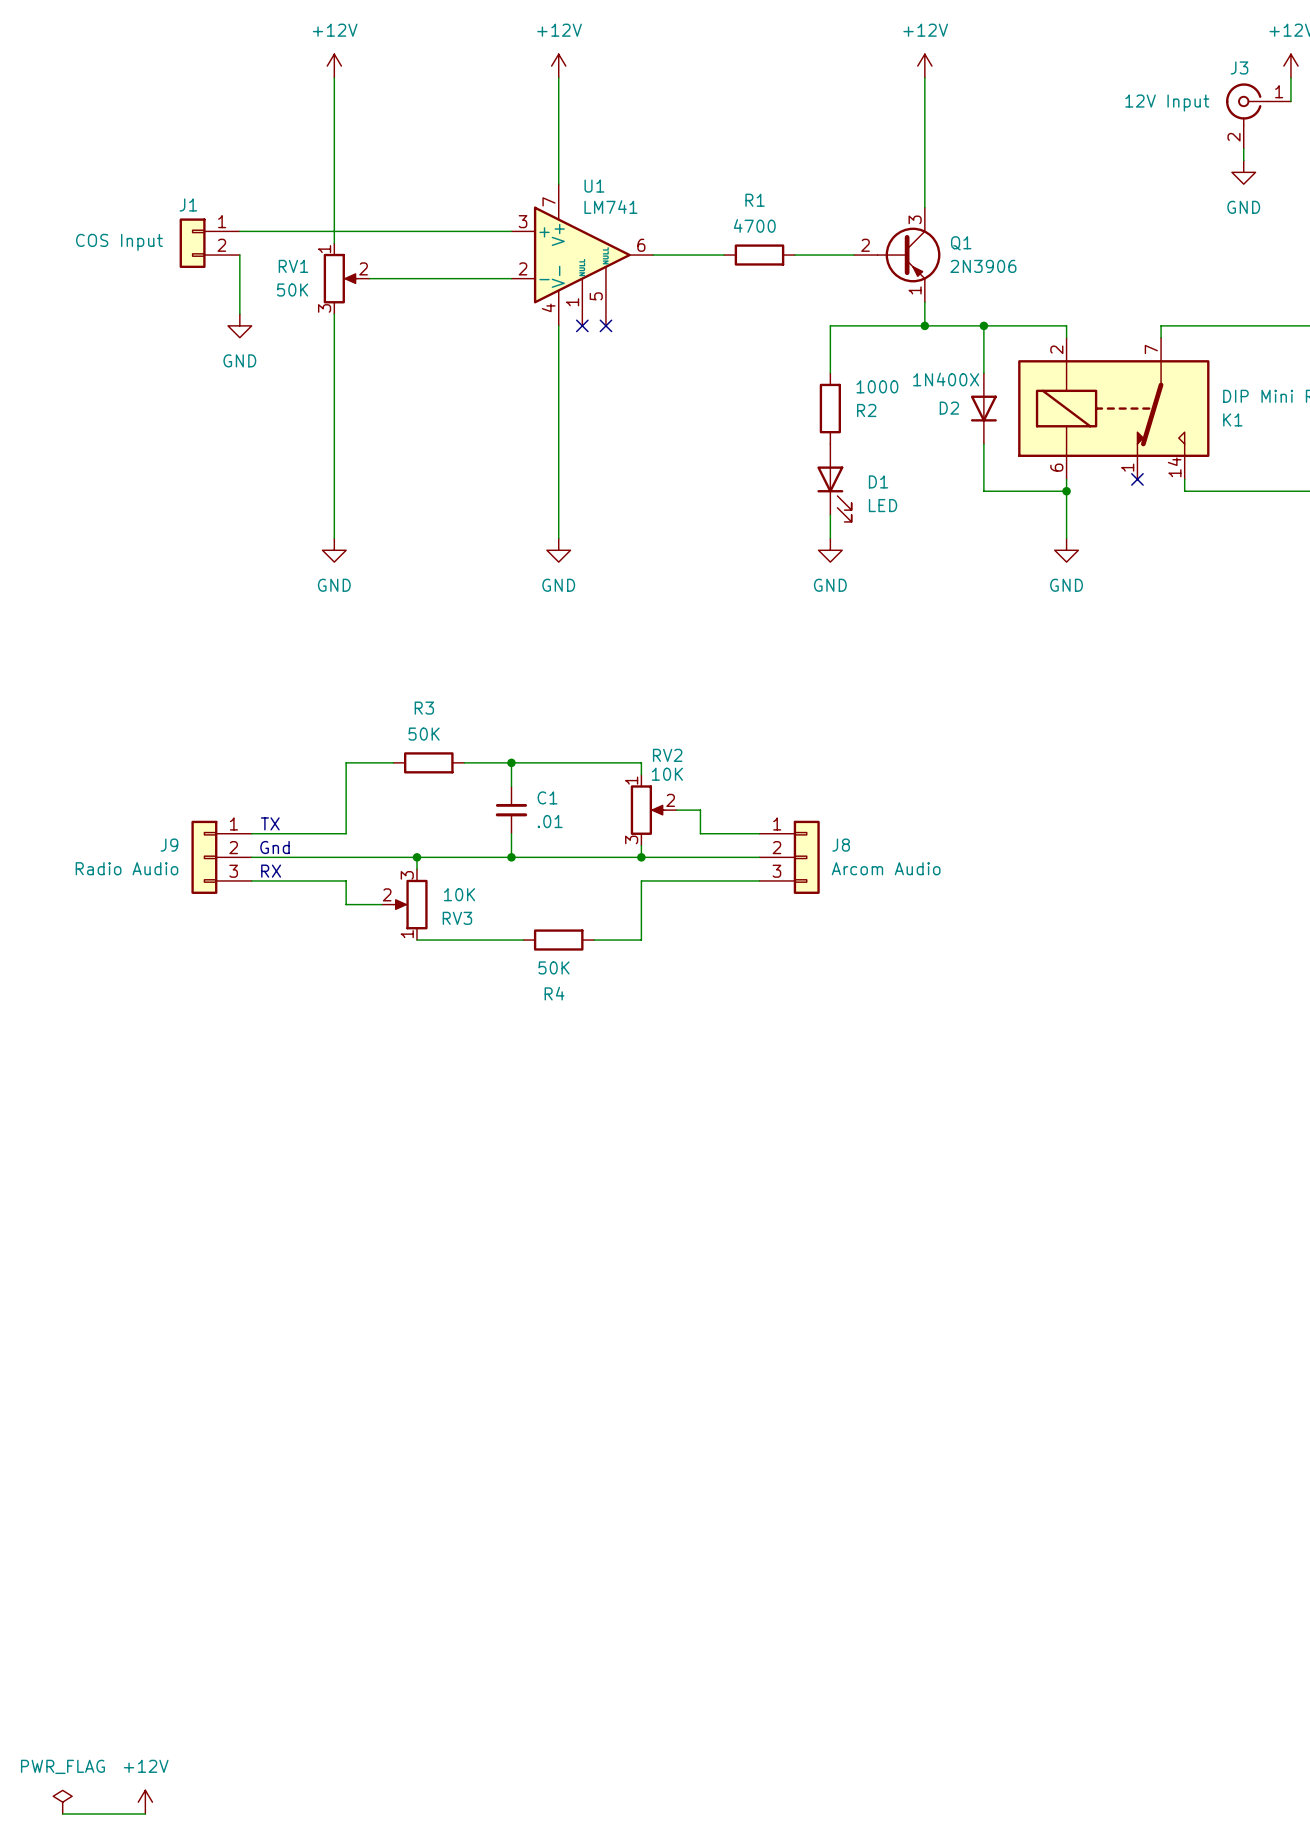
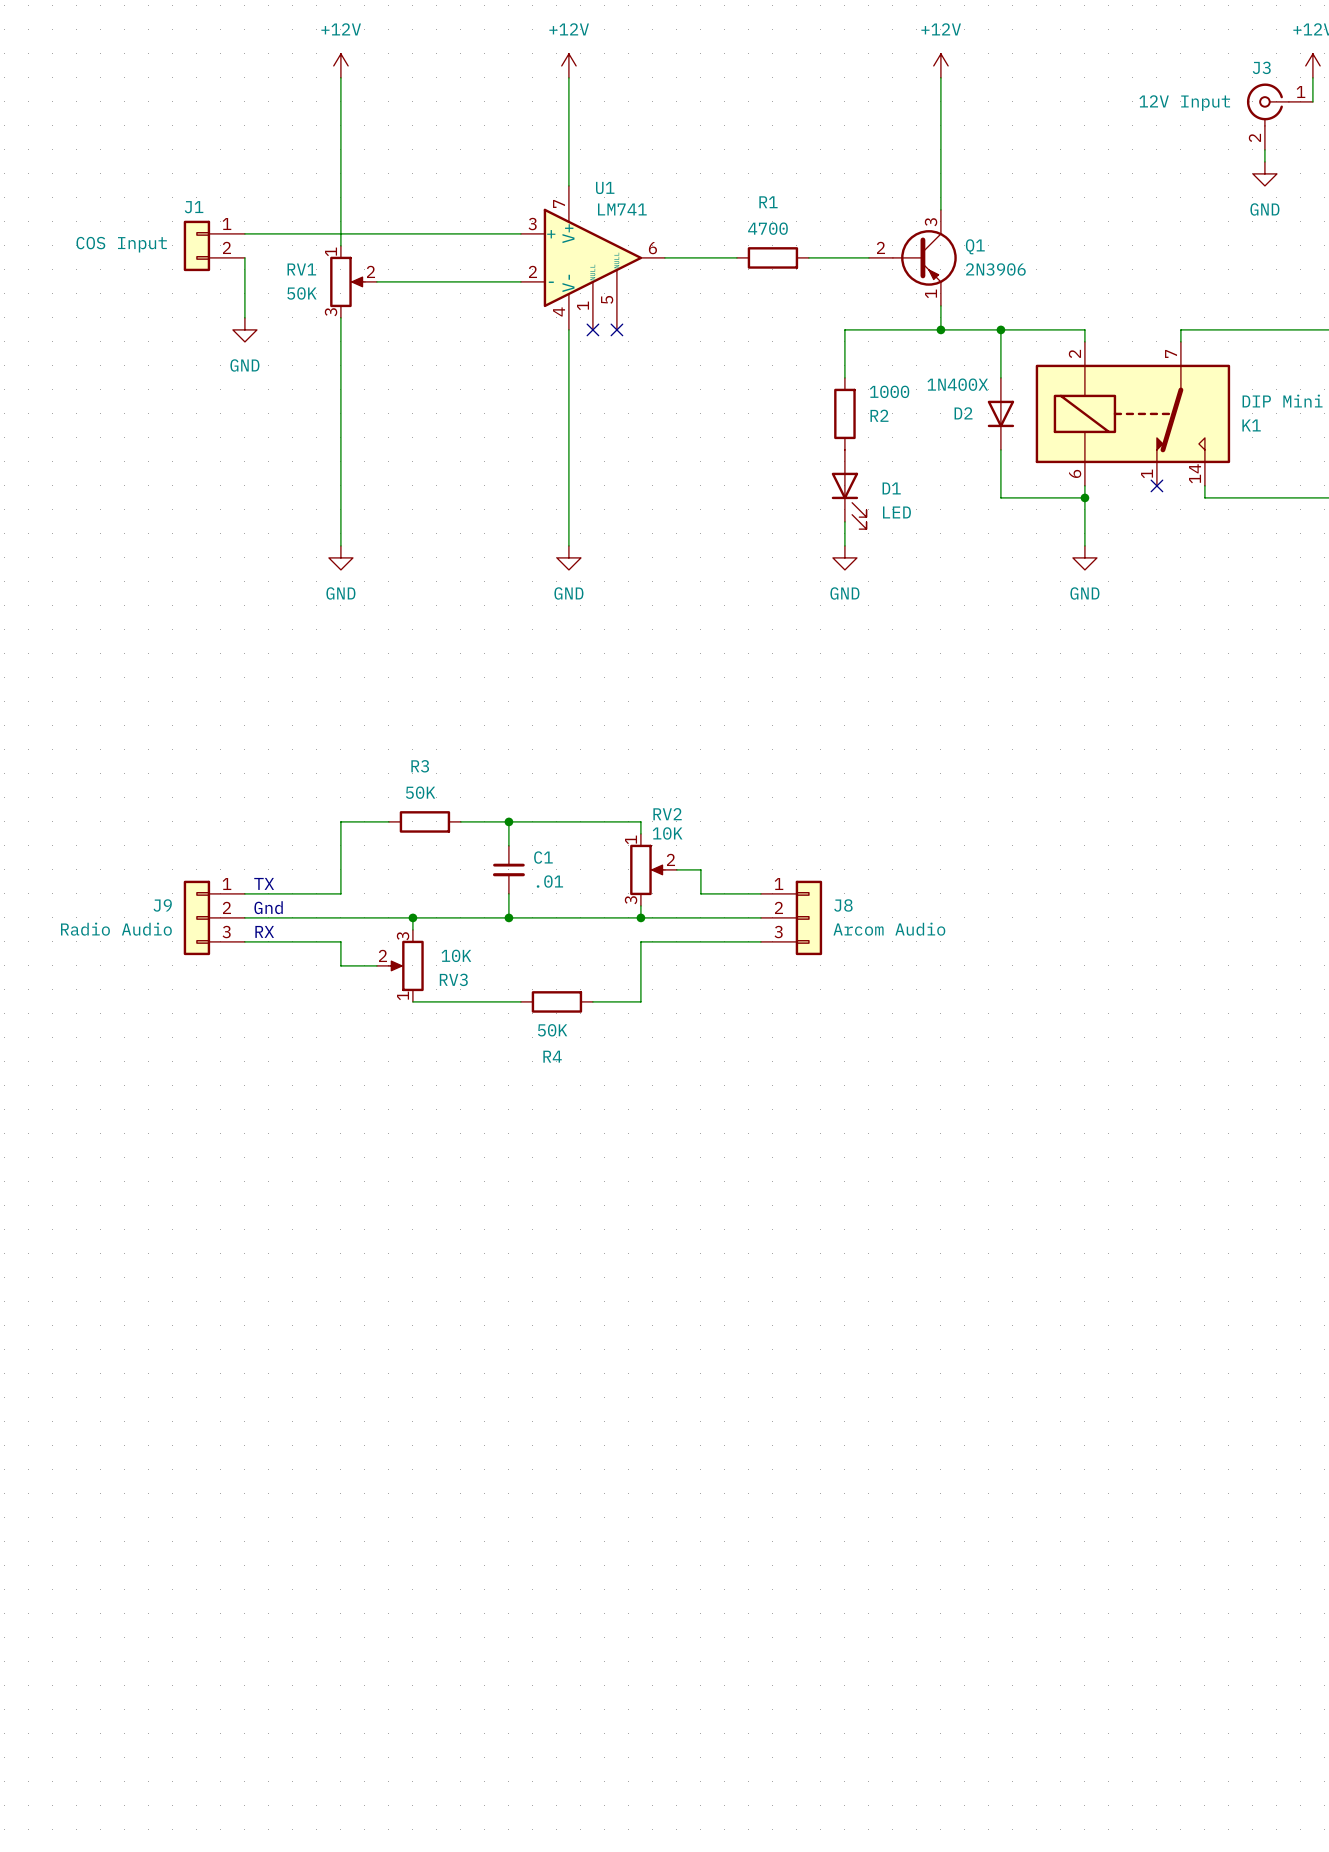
wire: (393, 762) (346, 762) (346, 833) (251, 833) -> none
R3 position: (428, 762) -> (424, 821)
wire: (464, 762) (641, 762) (641, 774) -> (460, 821) (640, 821) (640, 833)
wire: (511, 762) (511, 786) -> (508, 821) (508, 845)
junction: (511, 762) -> none
wire: none -> (388, 821) (340, 821) (340, 893)
junction: none -> (508, 821)
C1 position: (511, 810) -> (508, 869)
RV2 position: (653, 810) -> (653, 869)
wire: (676, 810) (700, 810) (700, 833) (759, 833) -> none
text position: TX (270, 823) -> TX (264, 883)
wire: (511, 833) (511, 857) -> (508, 893) (508, 917)
wire: (641, 845) (641, 857) -> (640, 905) (640, 917)
text position: Gnd (274, 847) -> Gnd (268, 907)
J9 position: (221, 857) -> (214, 917)
wire: (251, 857) (665, 857) -> none
wire: (416, 857) (416, 869) -> (412, 917) (412, 929)
junction: (416, 857) -> none
junction: (511, 857) -> none
junction position: (641, 857) -> (640, 917)
wire: (688, 857) (759, 857) -> (700, 869) (700, 893)
J8 position: (789, 857) -> (791, 917)
text position: RX (271, 871) -> RX (264, 931)
wire: (334, 880) (346, 880) (346, 904) -> (244, 917) (352, 917)
wire: (688, 880) (641, 880) (641, 940) (594, 940) -> none
wire: none -> (388, 917) (760, 917)
RV3 position: (404, 904) -> (400, 965)
junction: none -> (412, 917)
junction: none -> (508, 917)
wire: none -> (244, 941) (340, 941) (340, 965) (376, 965)
wire: none -> (760, 941) (640, 941) (640, 1001) (592, 1001)
wire: (416, 940) (523, 940) -> (412, 1001) (520, 1001)
R4 position: (558, 940) -> (556, 1001)
power symbol: PWR_FLAG (62, 1802) -> none
power symbol: +12V (145, 1802) -> none
wire: (62, 1814) (145, 1814) -> none

